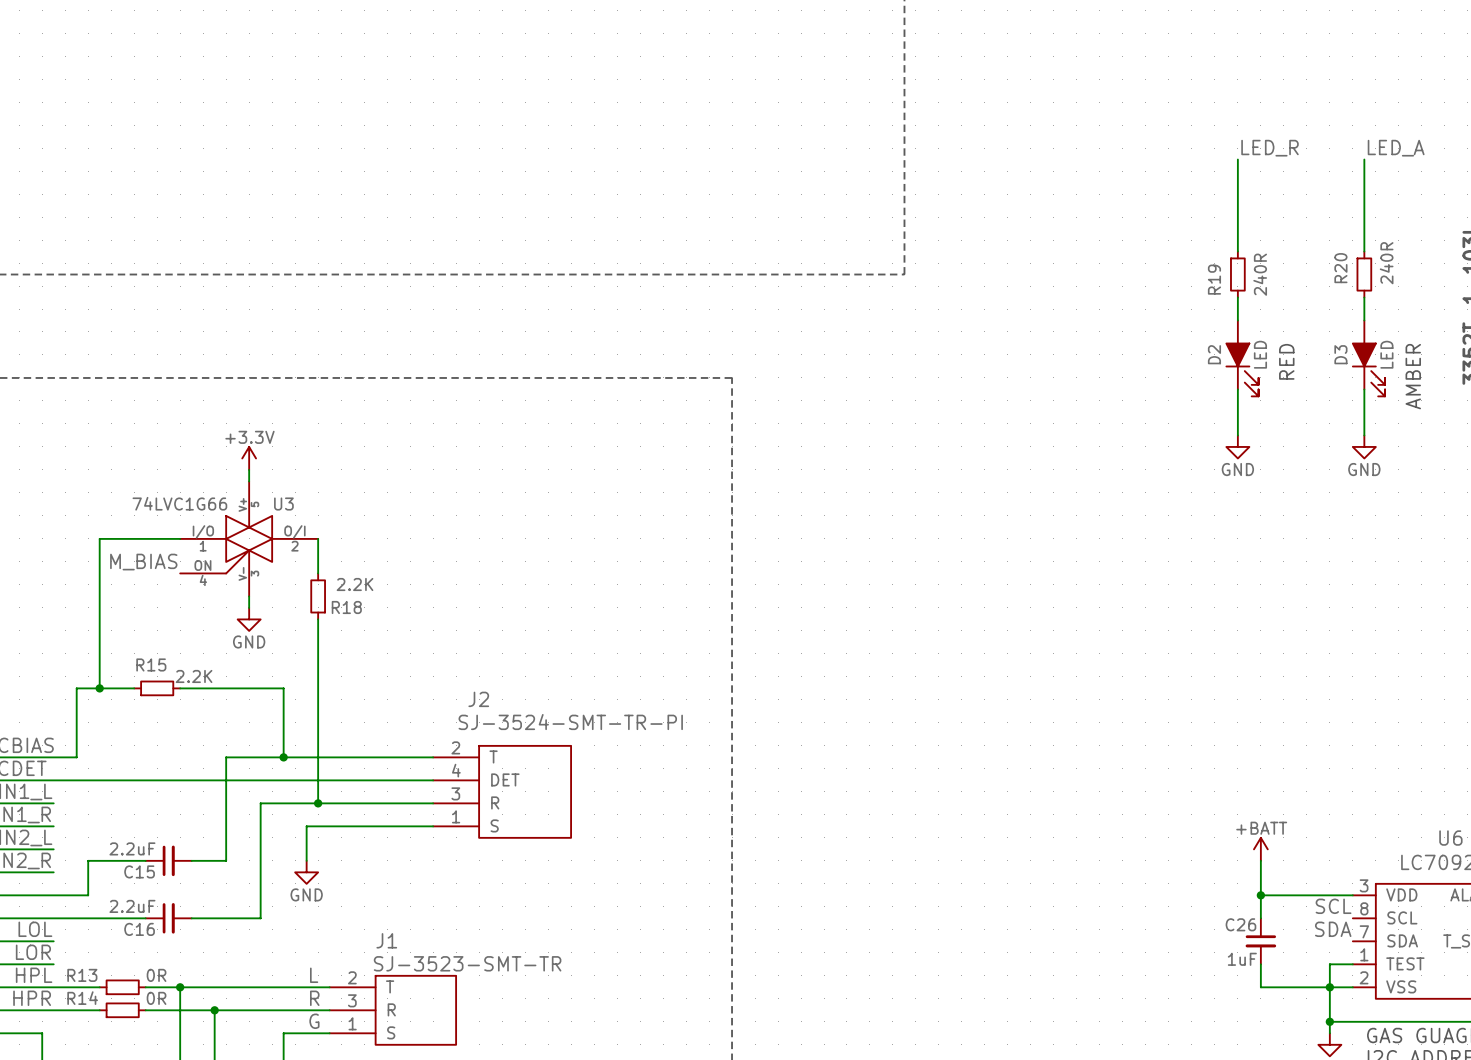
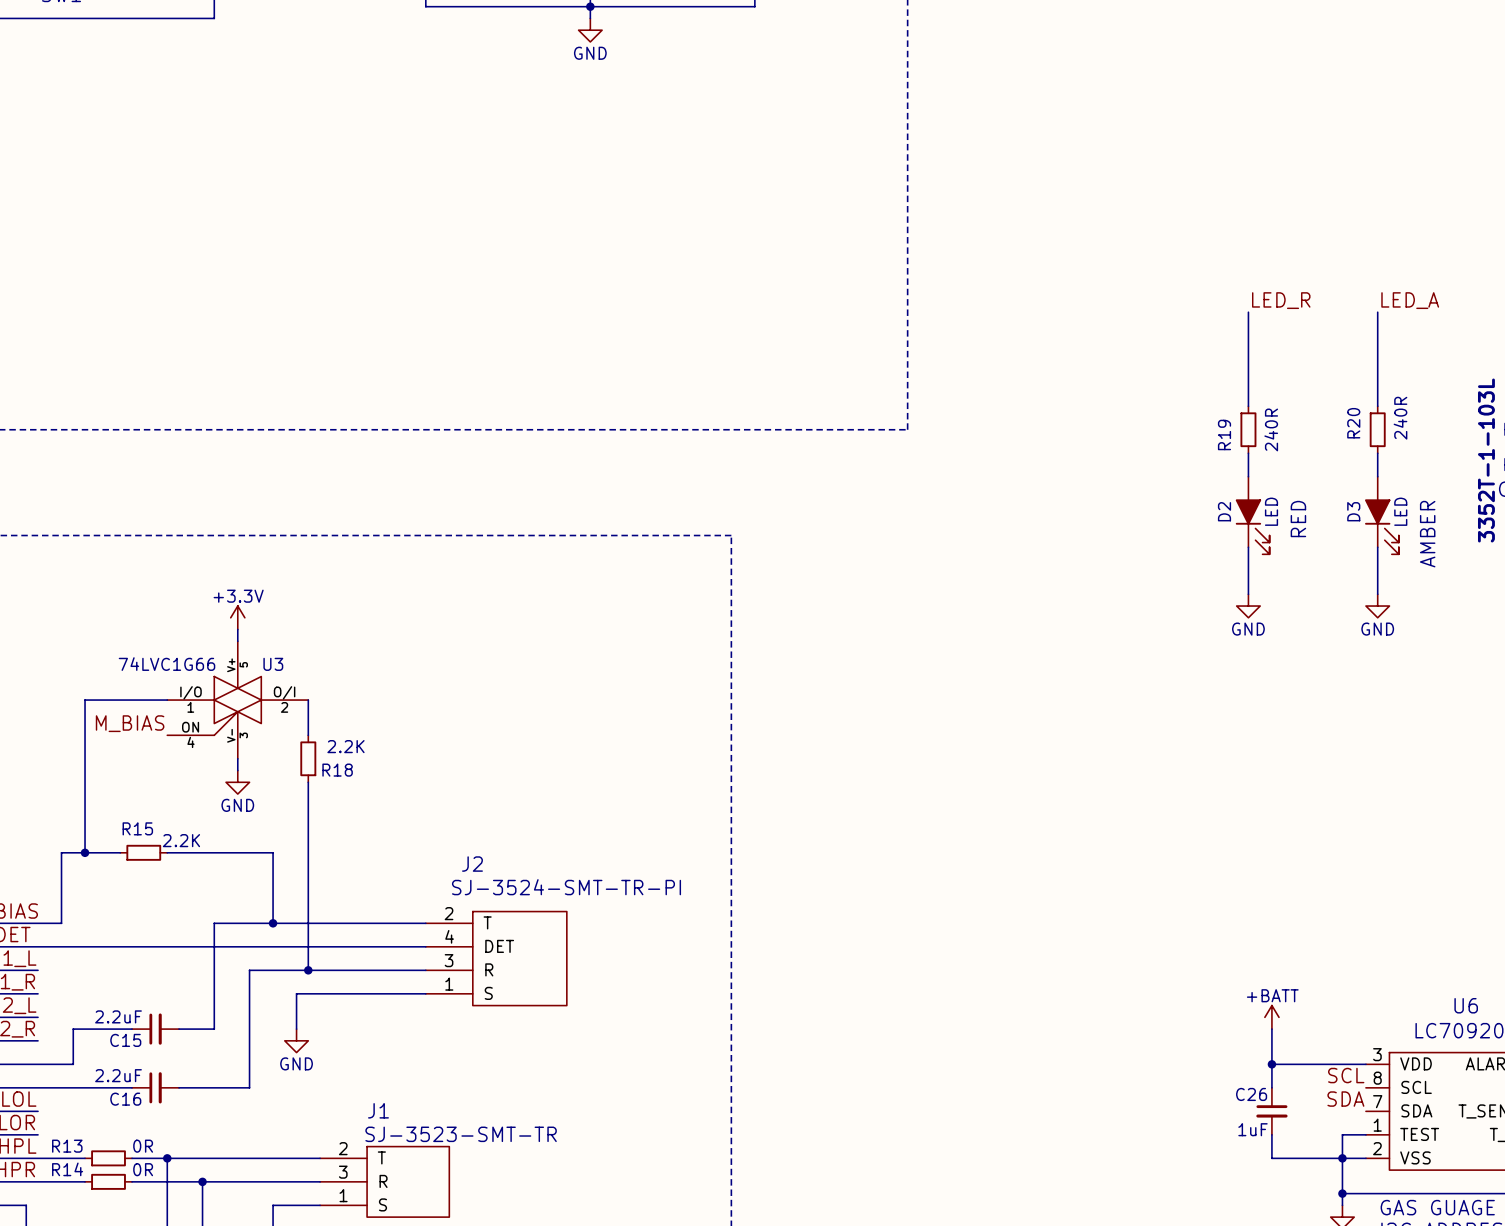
label: L (314, 975) -> none
label: R (314, 998) -> none
label: G (314, 1021) -> none

